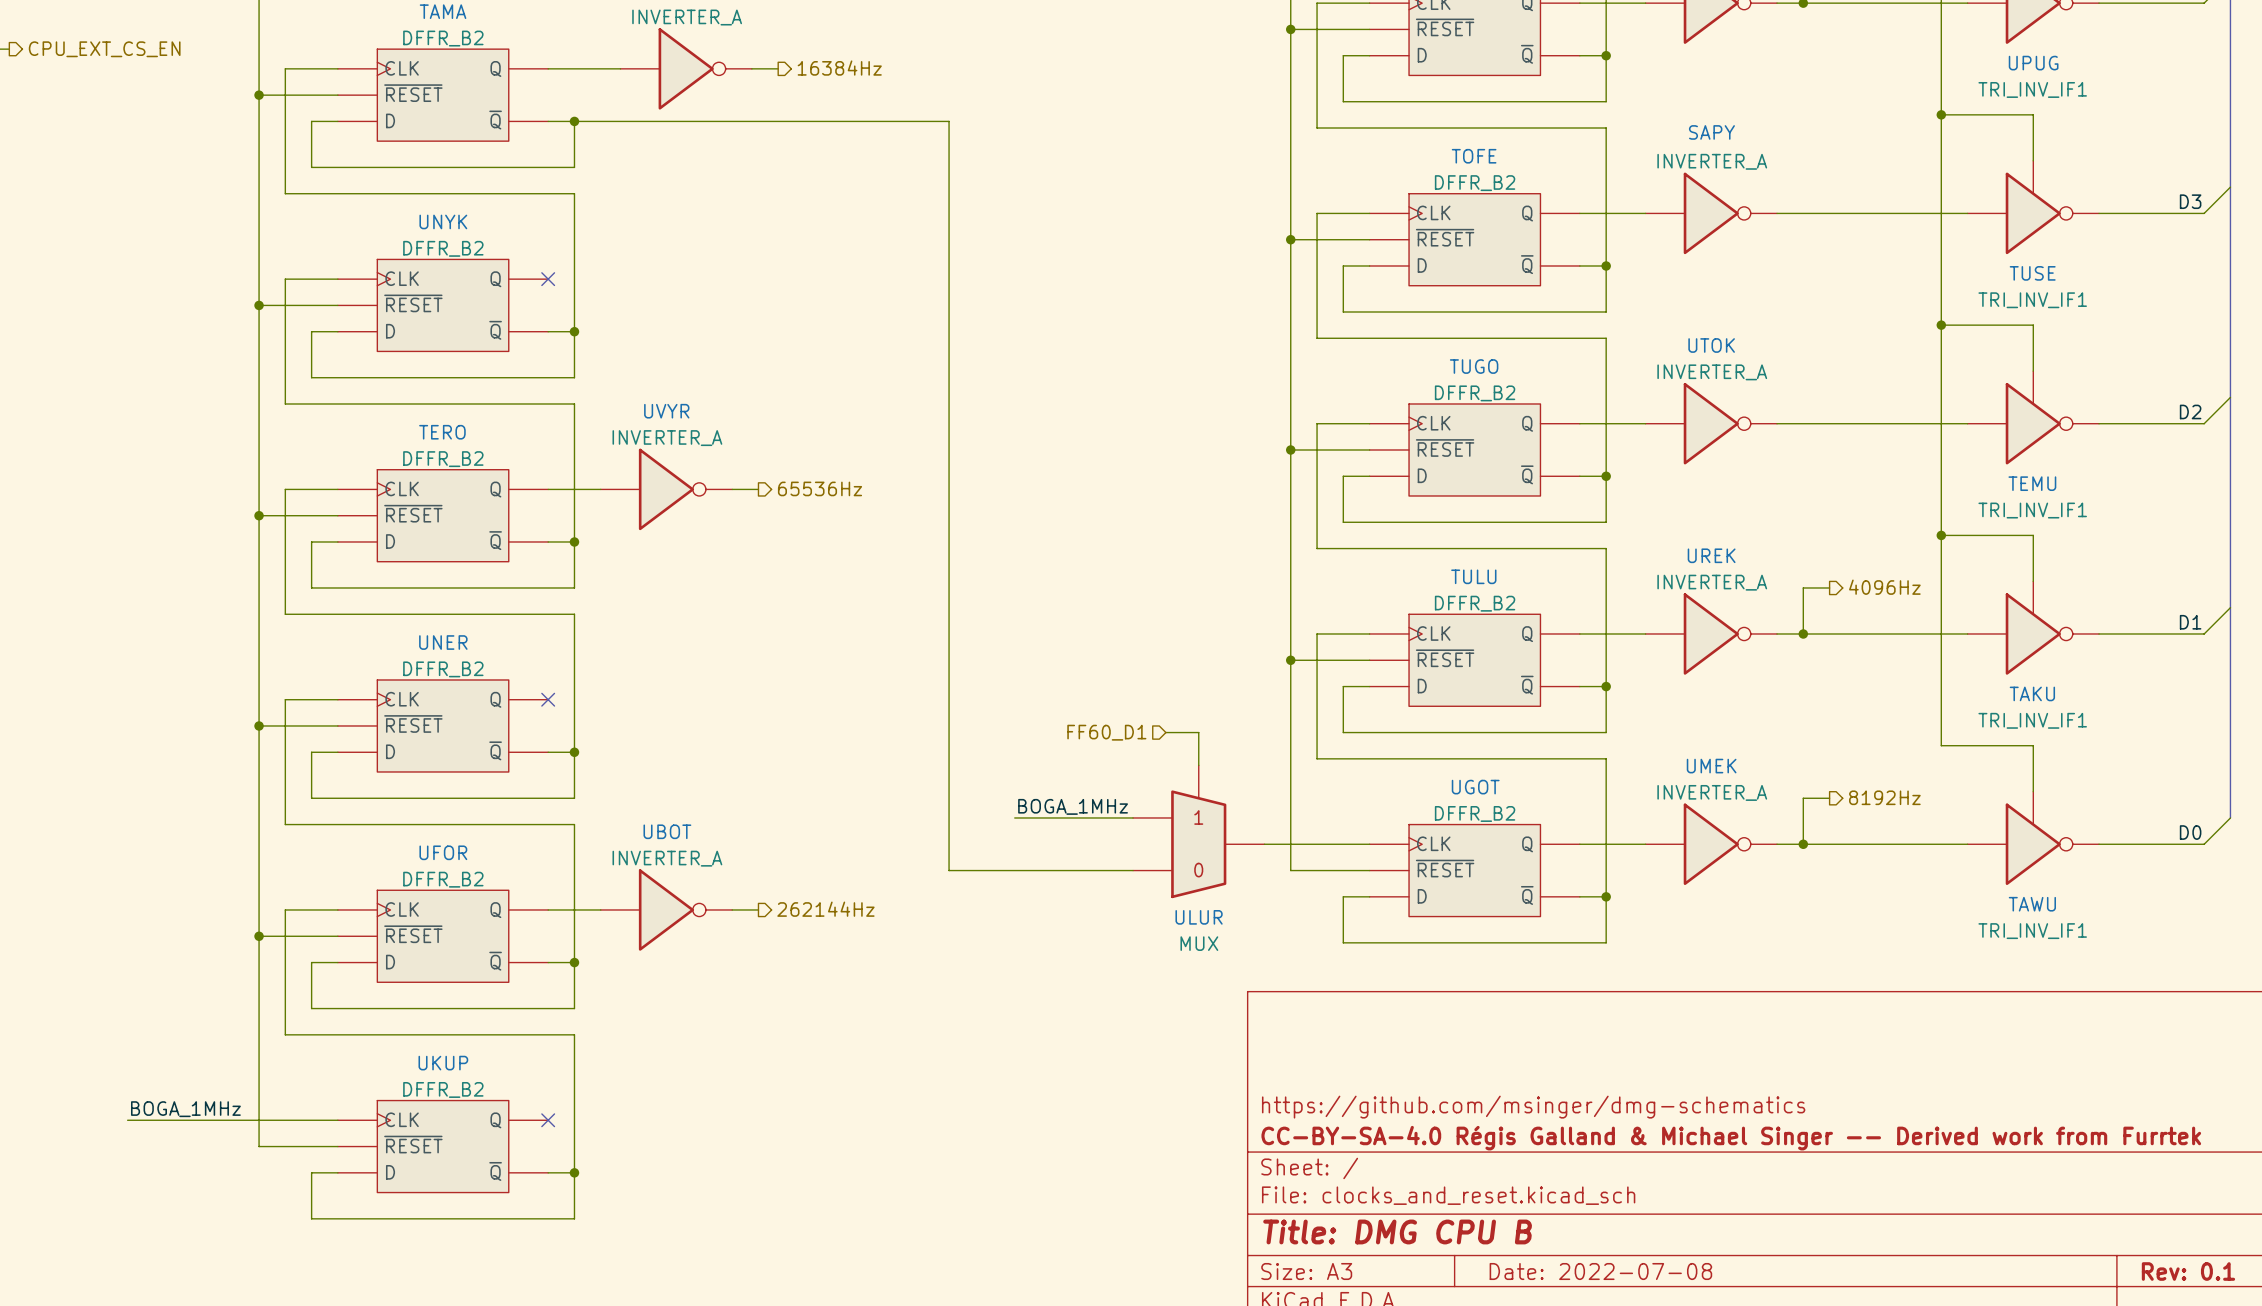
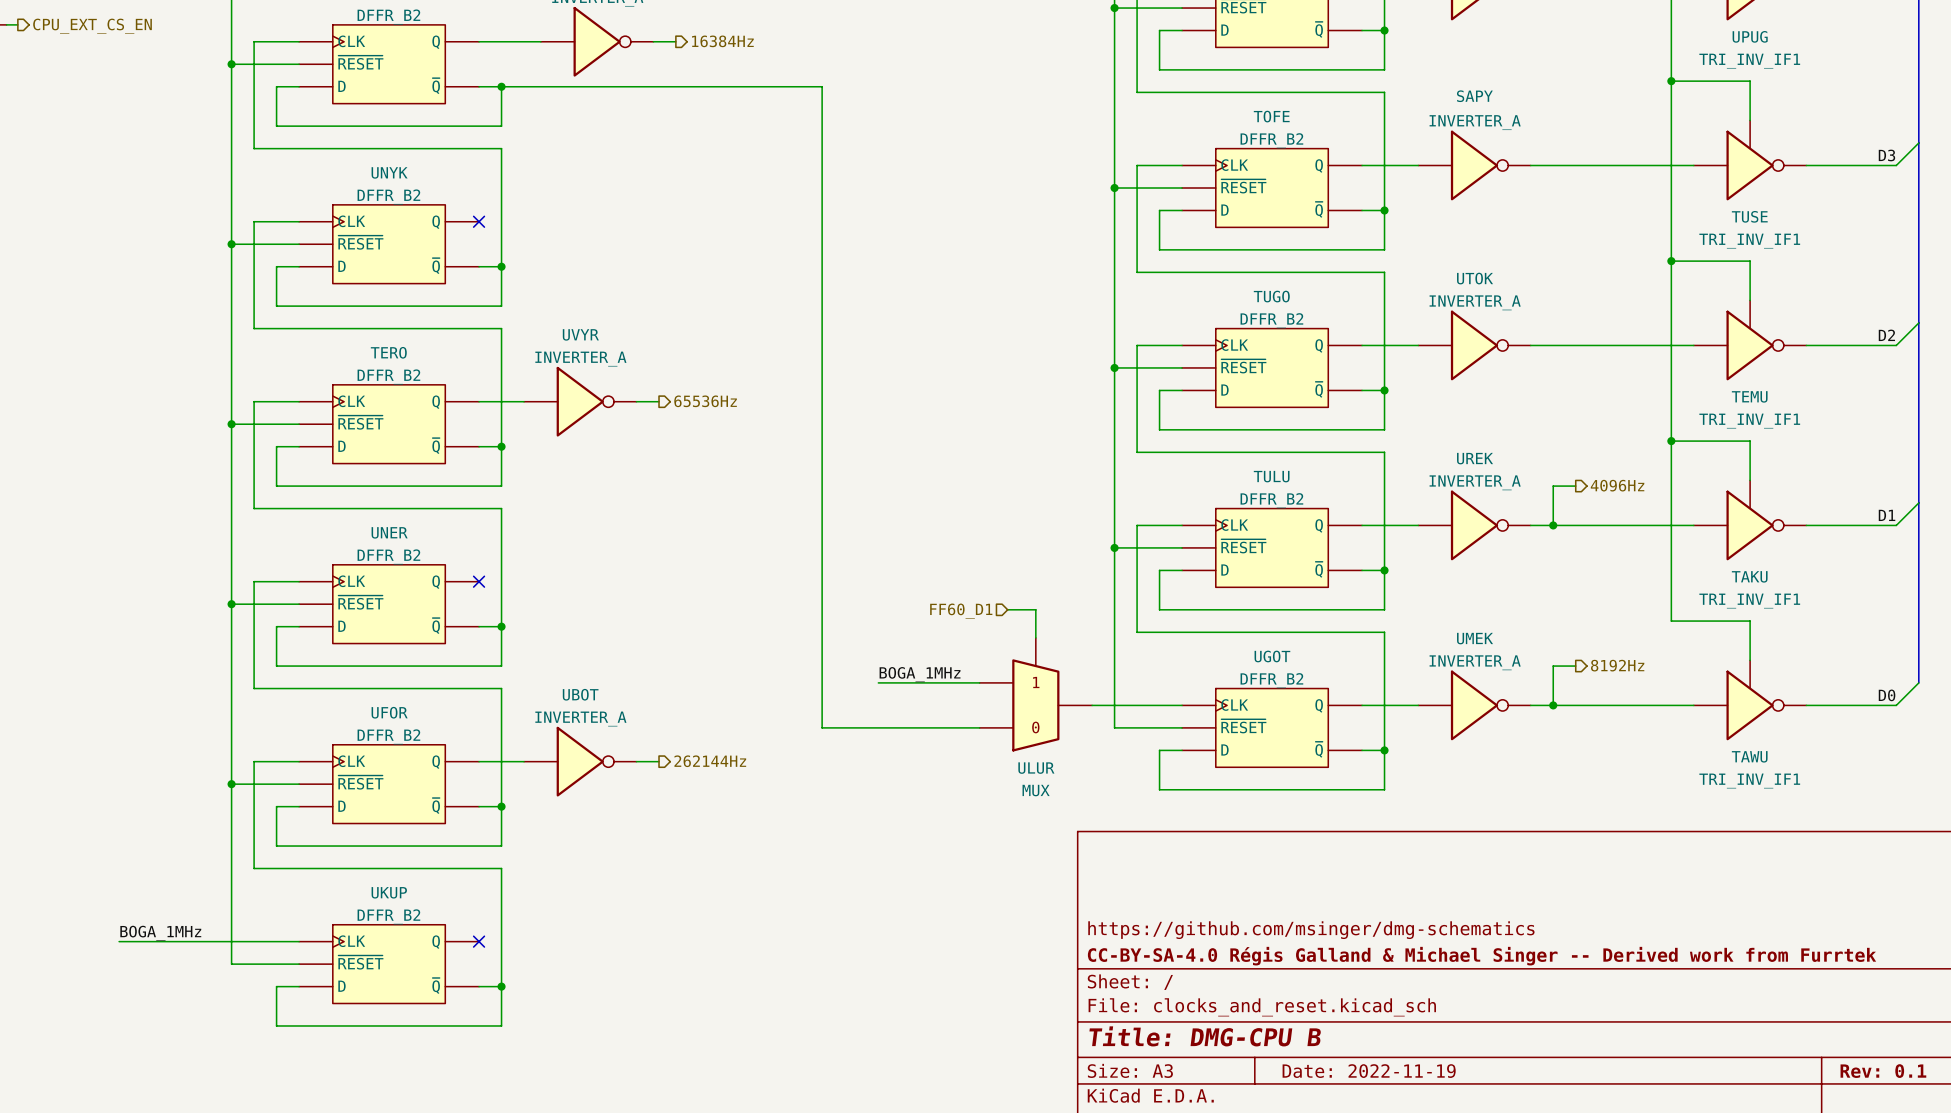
title block: Title: DMG CPU B (1397, 1231) -> Title: DMG-CPU B (1205, 1036)
title block: Date: 2022-07-08 (1600, 1271) -> Date: 2022-11-19 (1369, 1071)

